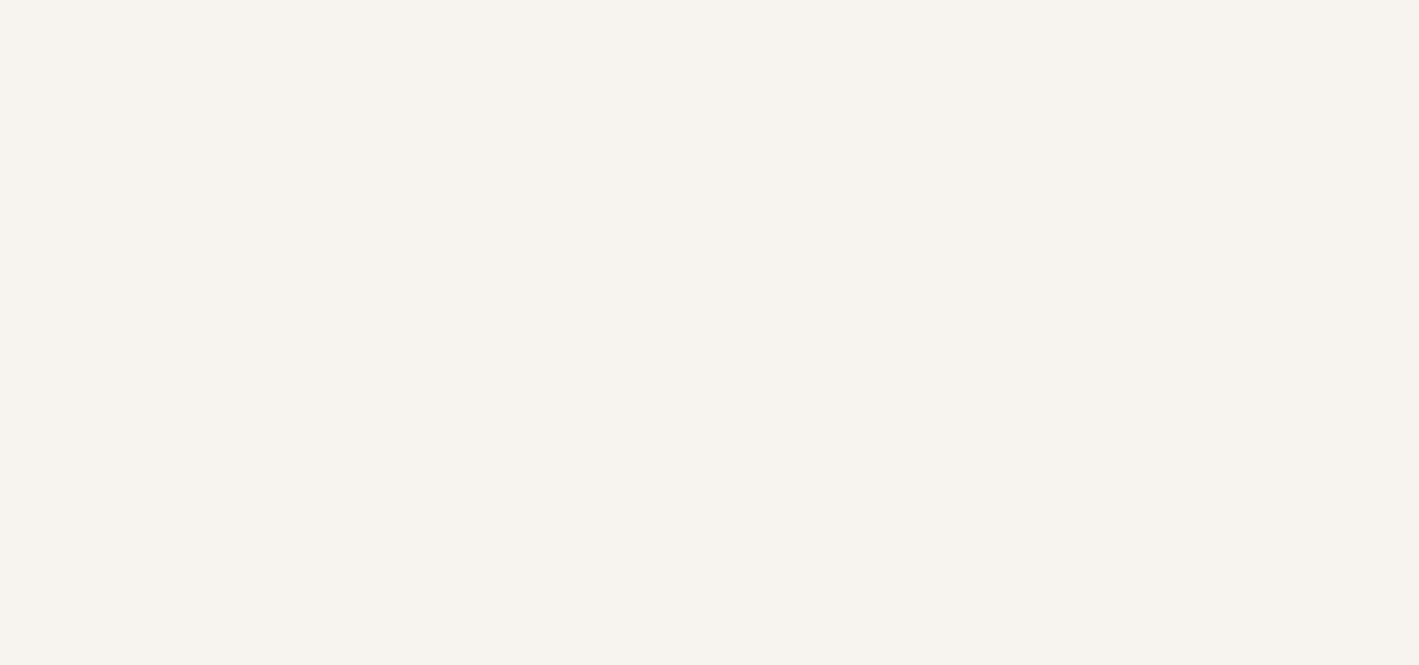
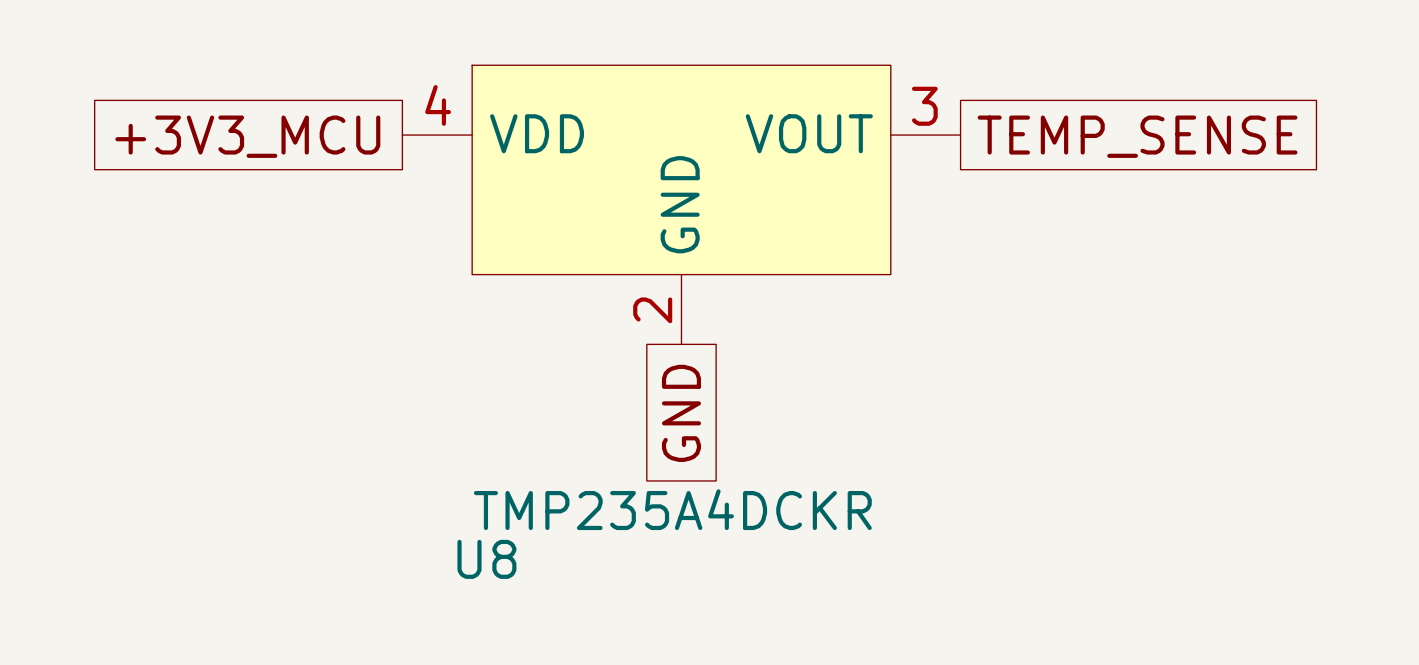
global label: none -> +3V3_MCU (247, 136)
global label: none -> TEMP_SENSE (1137, 136)
U8: none -> TMP235A4DCKR (681, 204)
global label: none -> GND (681, 413)

